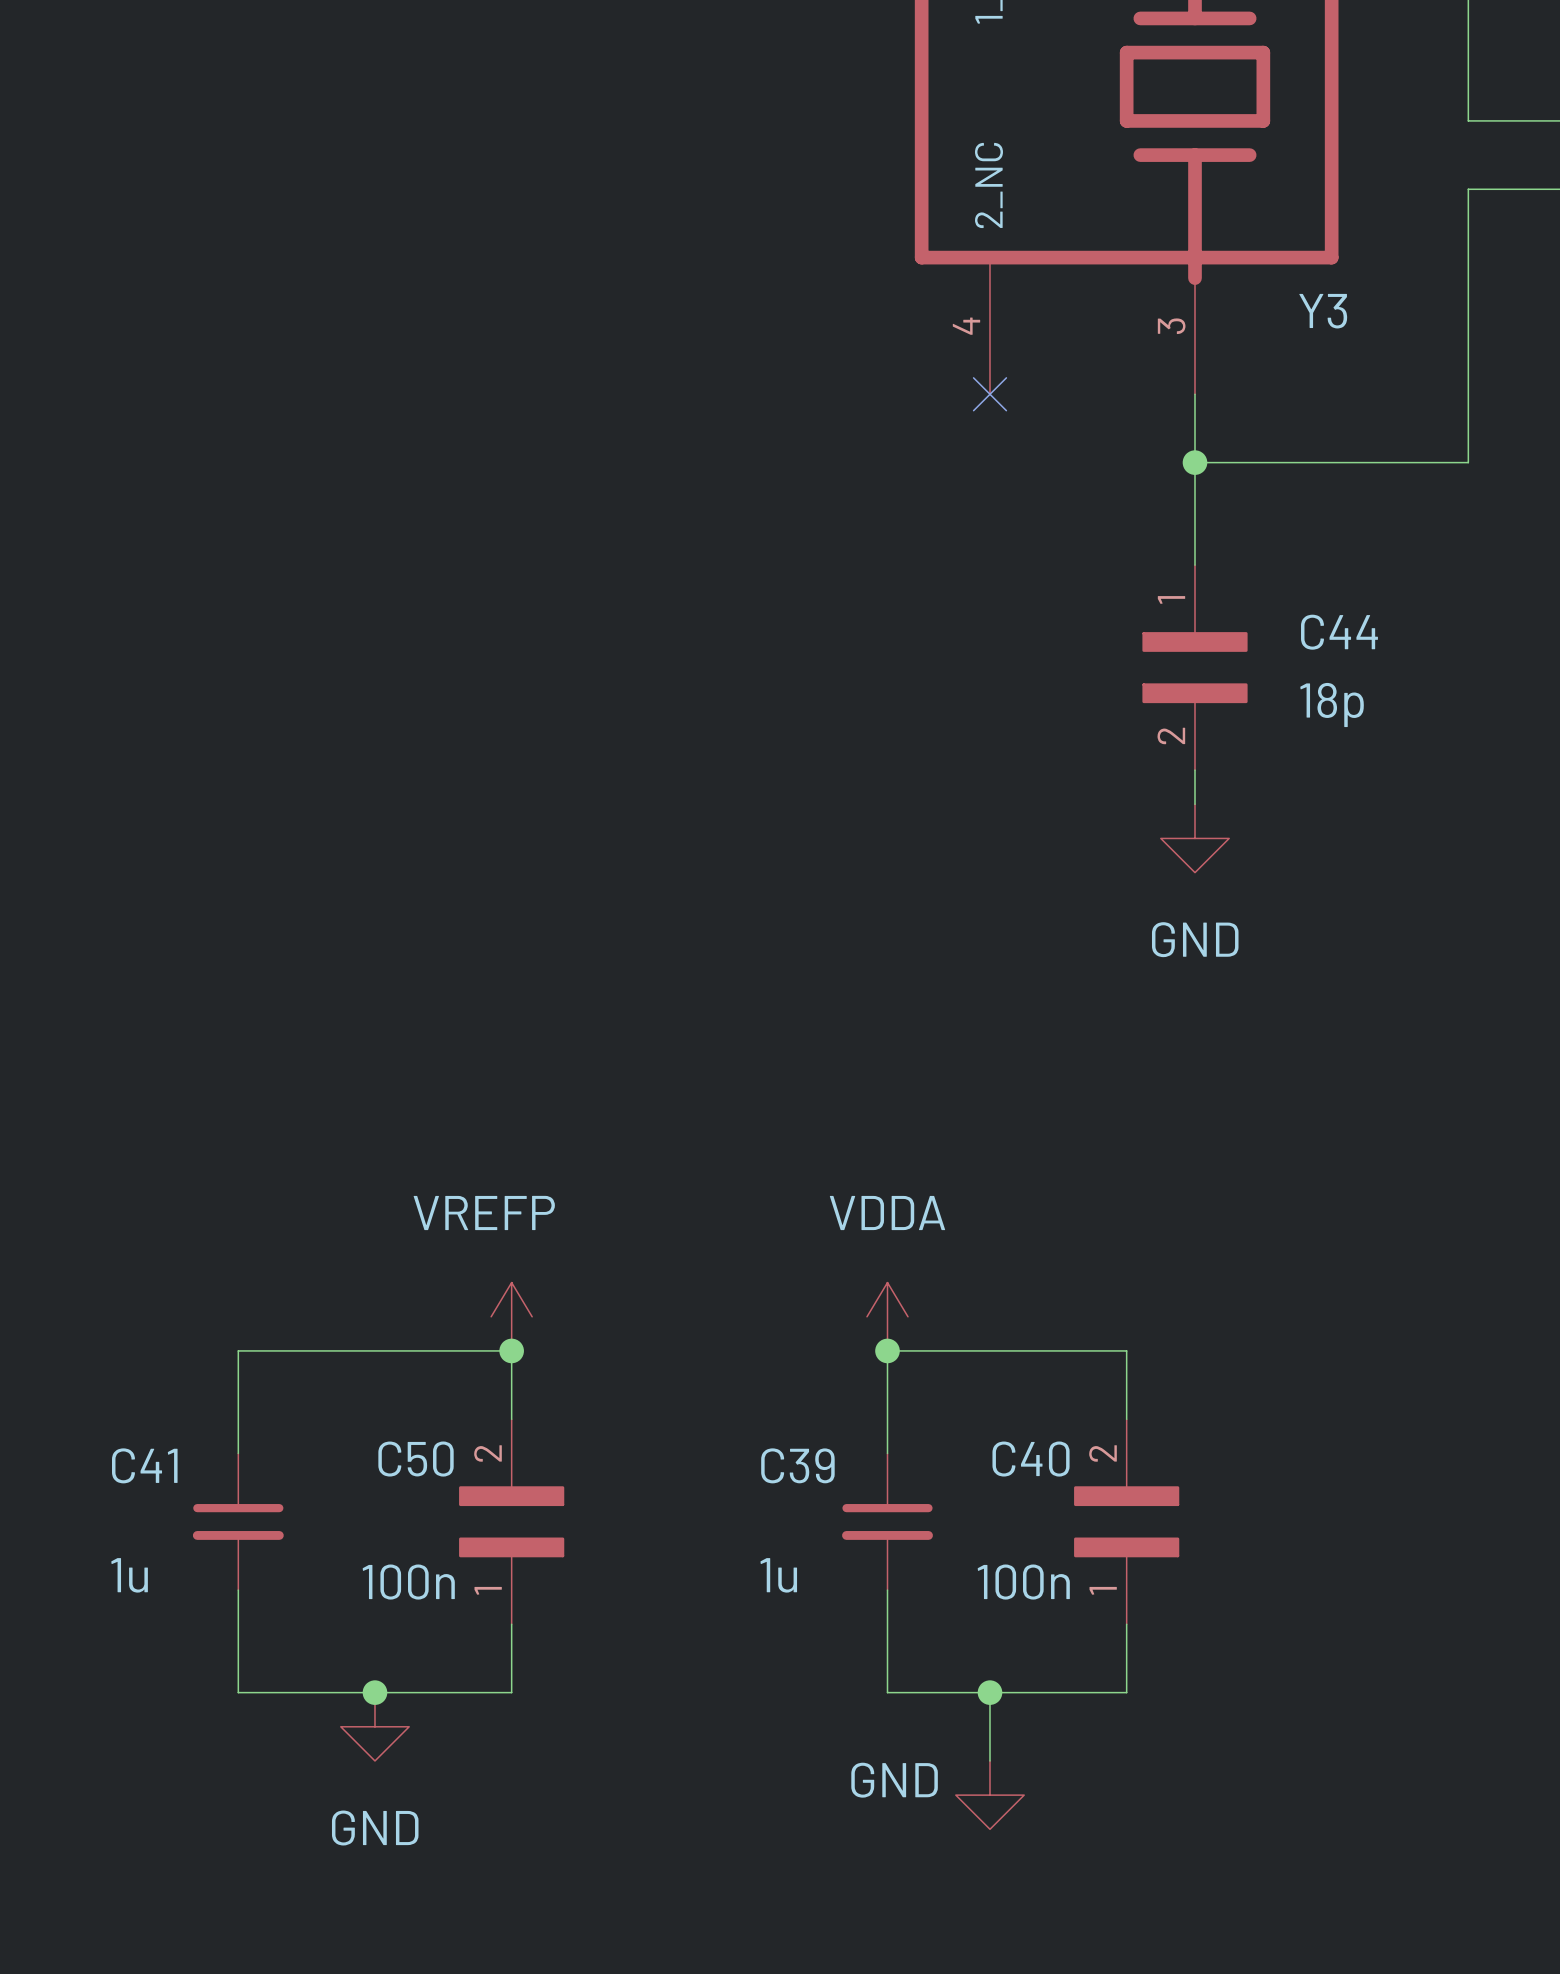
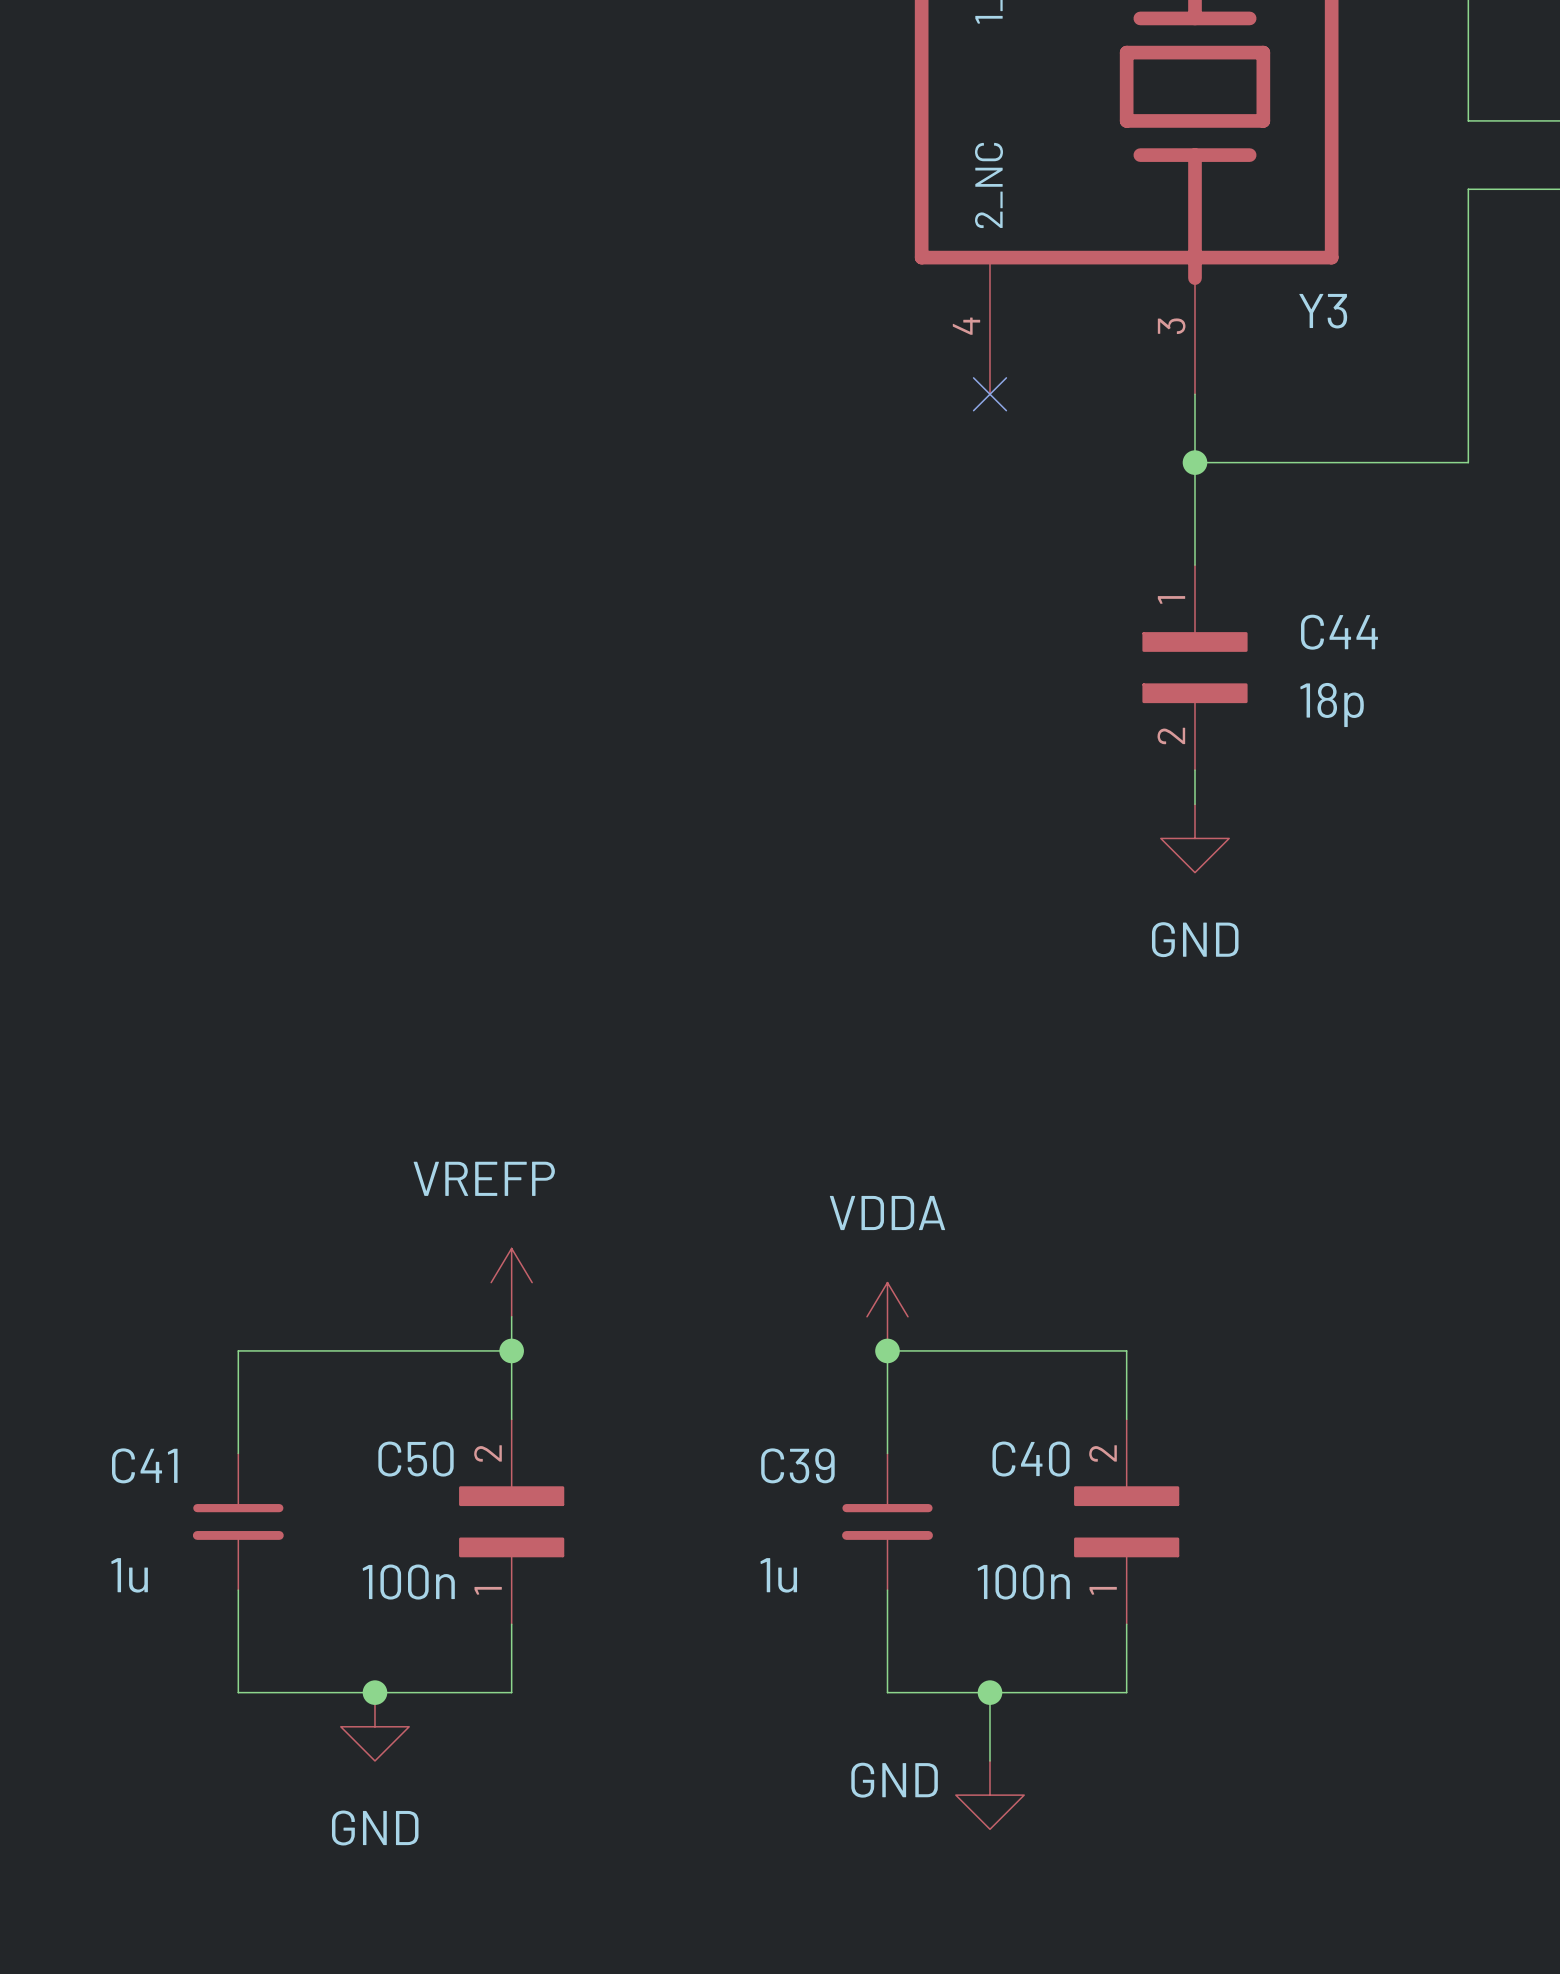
power symbol position: VREFP (511, 1316) -> VREFP (511, 1282)

